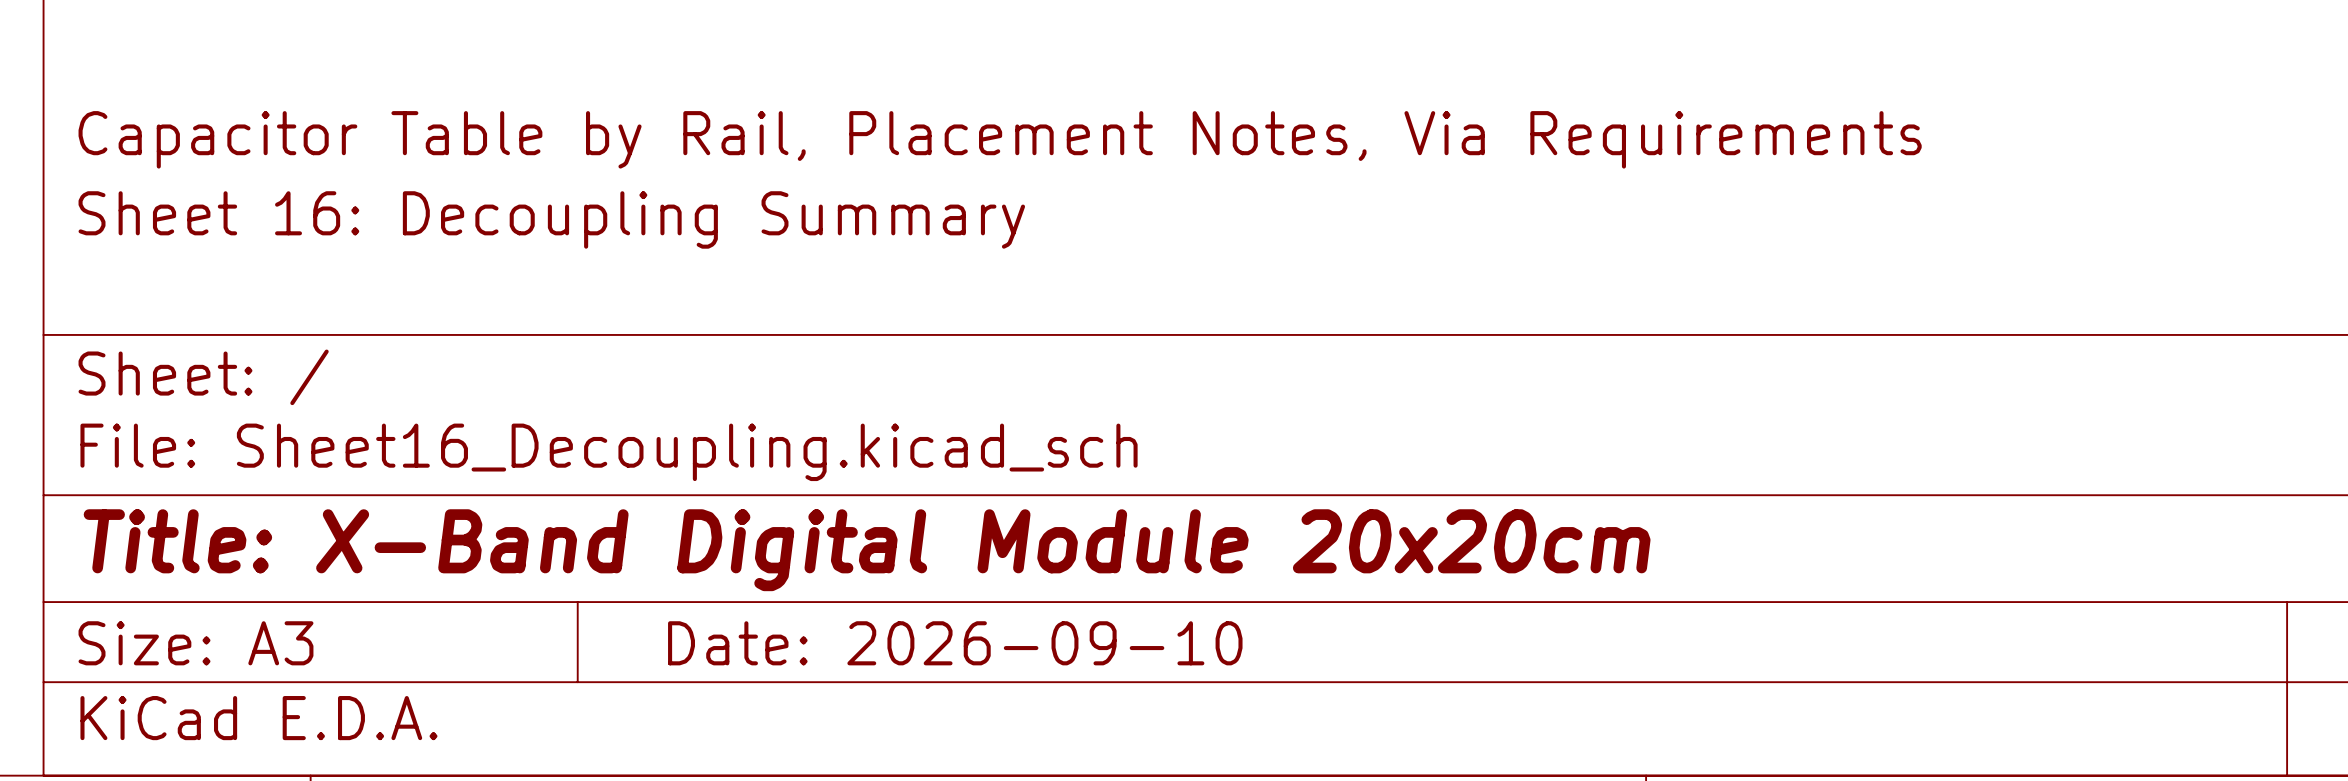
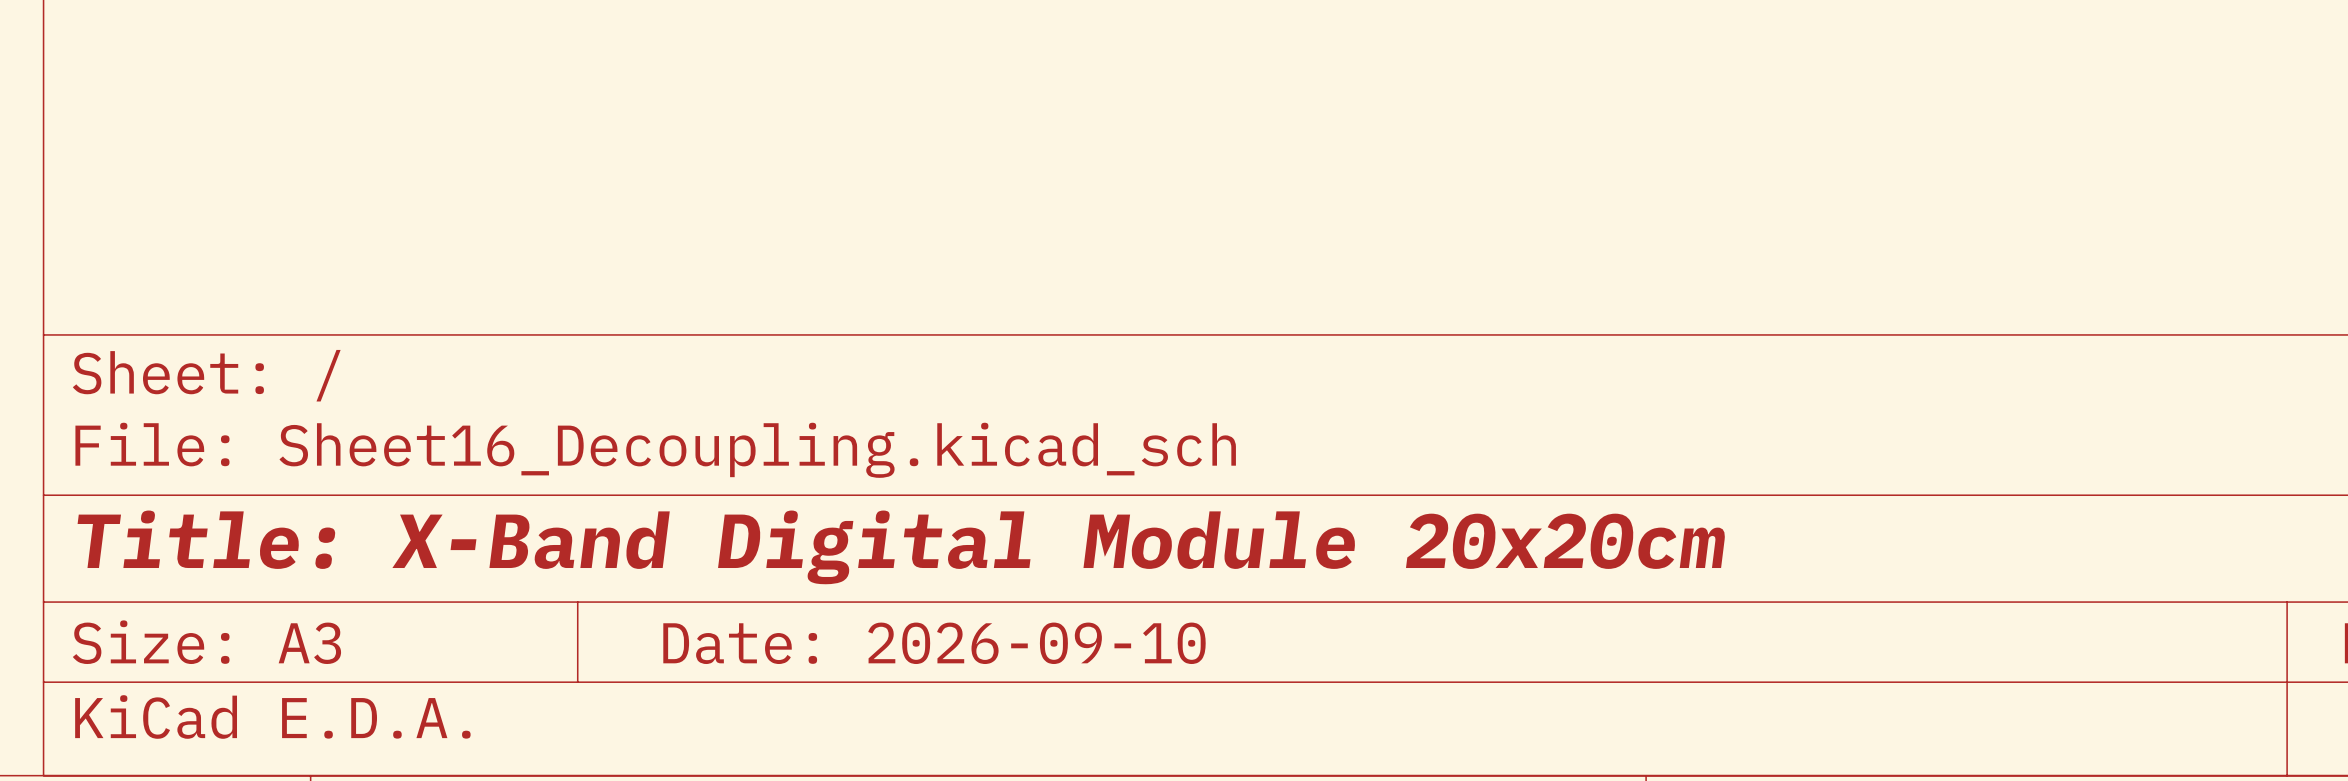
title block: Capacitor Table by Rail, Placement Notes, Via Requirements (1000, 139) -> none
title block: Sheet 16: Decoupling Summary (551, 219) -> none

